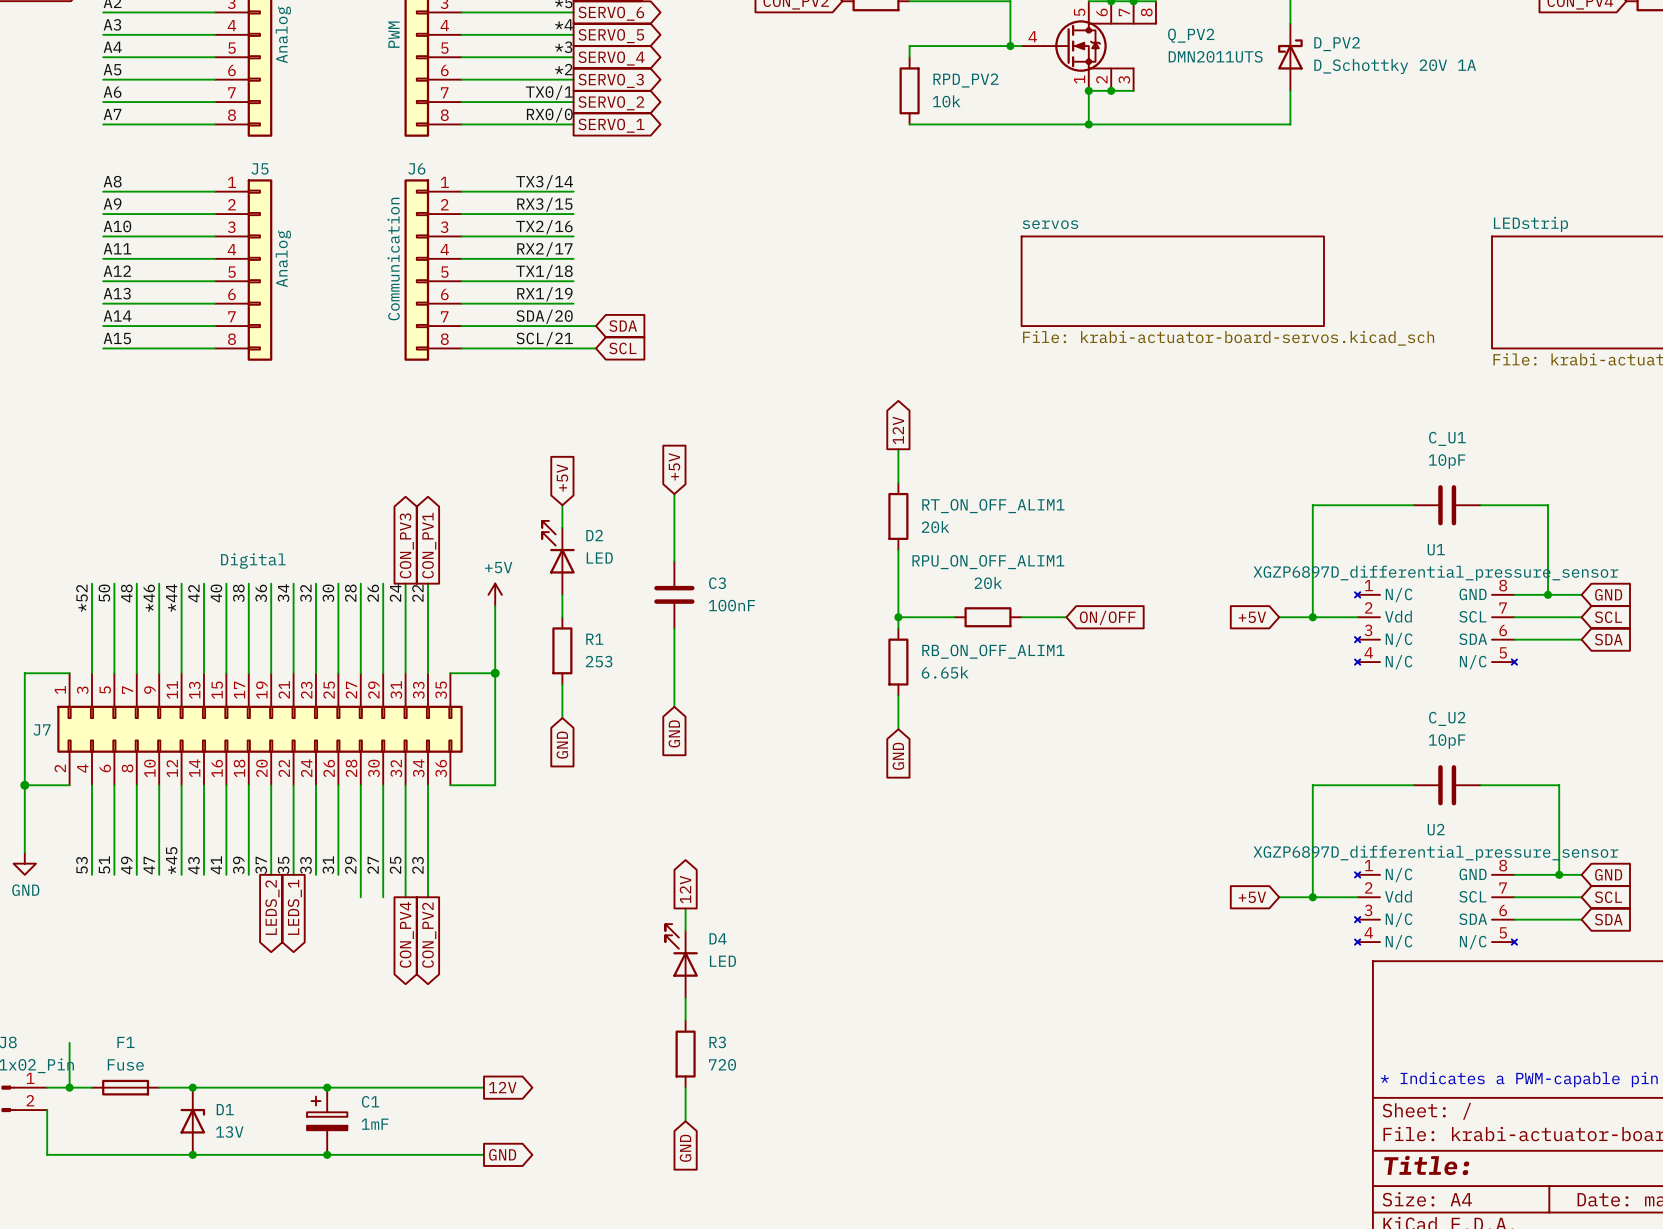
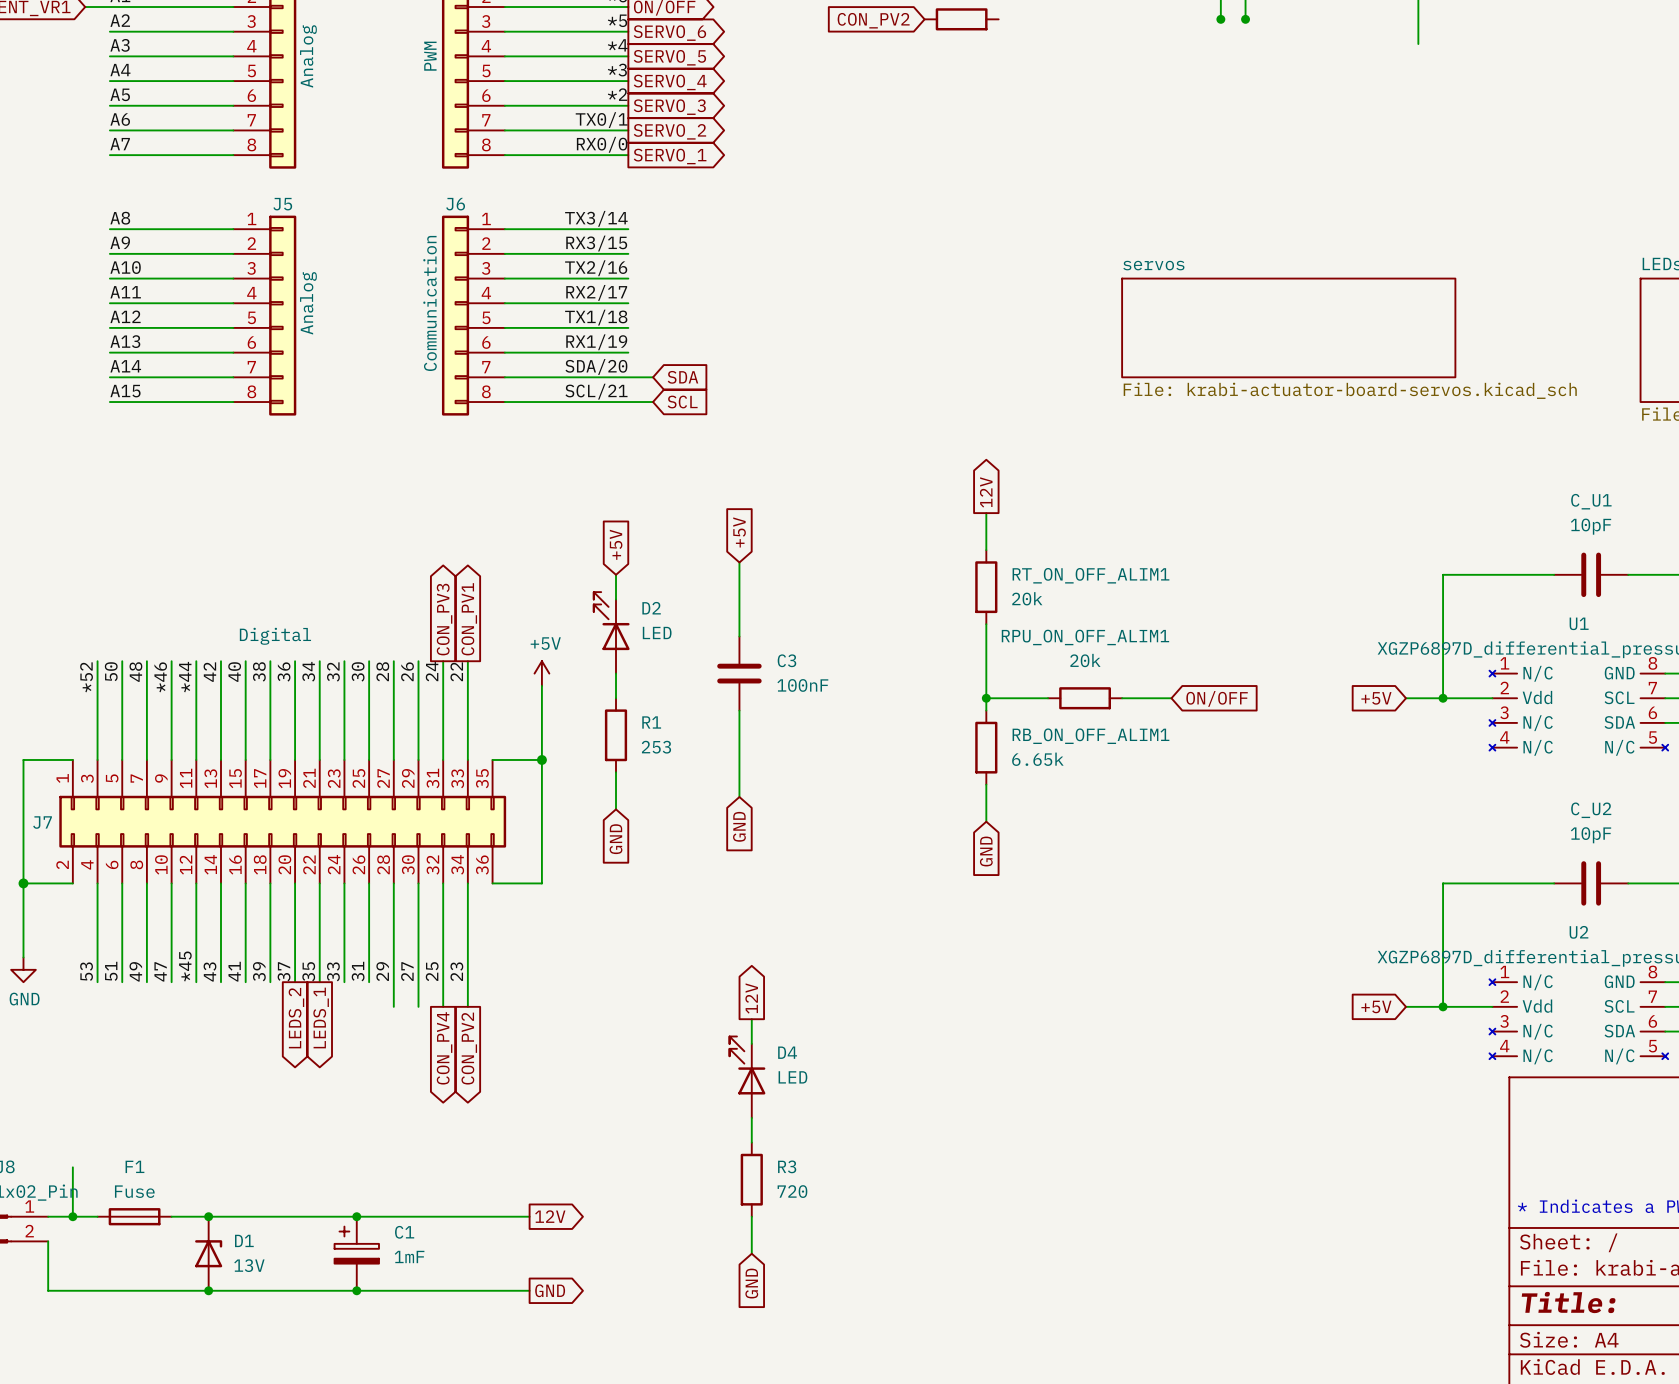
wire: (909, 1) (1010, 1) (1010, 46) -> none
wire: (1088, 1) (1156, 1) -> none
junction: (1010, 46) -> none
wire: (1021, 46) (909, 46) (909, 57) -> none
Q_PV2: DMN2011UTS (1088, 46) -> none
D_PV2: D_Schottky 20V 1A (1290, 57) -> none
RPD_PV2: 10k (909, 90) -> none
junction: (1088, 90) -> none
junction: (1111, 90) -> none
wire: (1133, 90) (1088, 90) (1088, 124) -> none
wire: (1290, 90) (1290, 124) (909, 124) -> none
junction: (1088, 124) -> none

